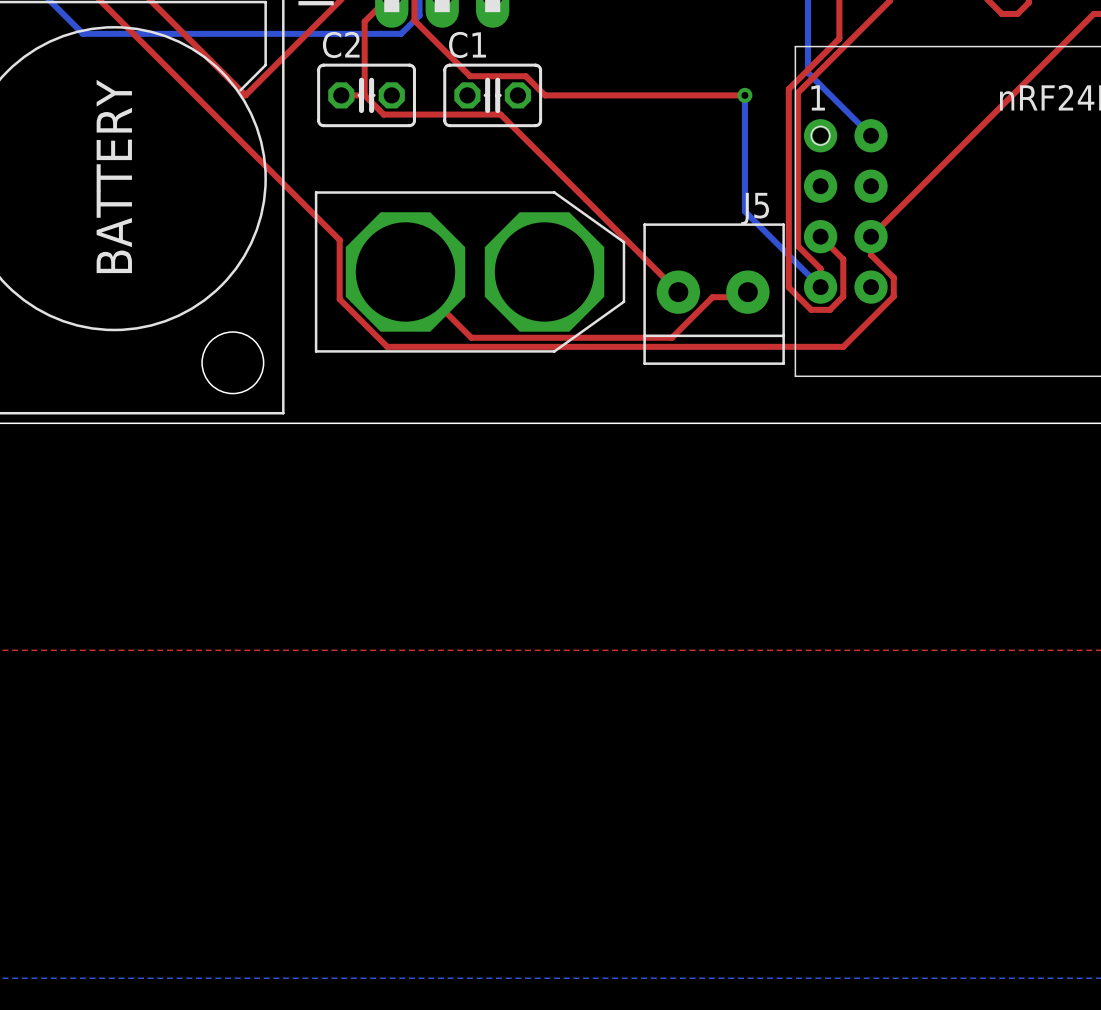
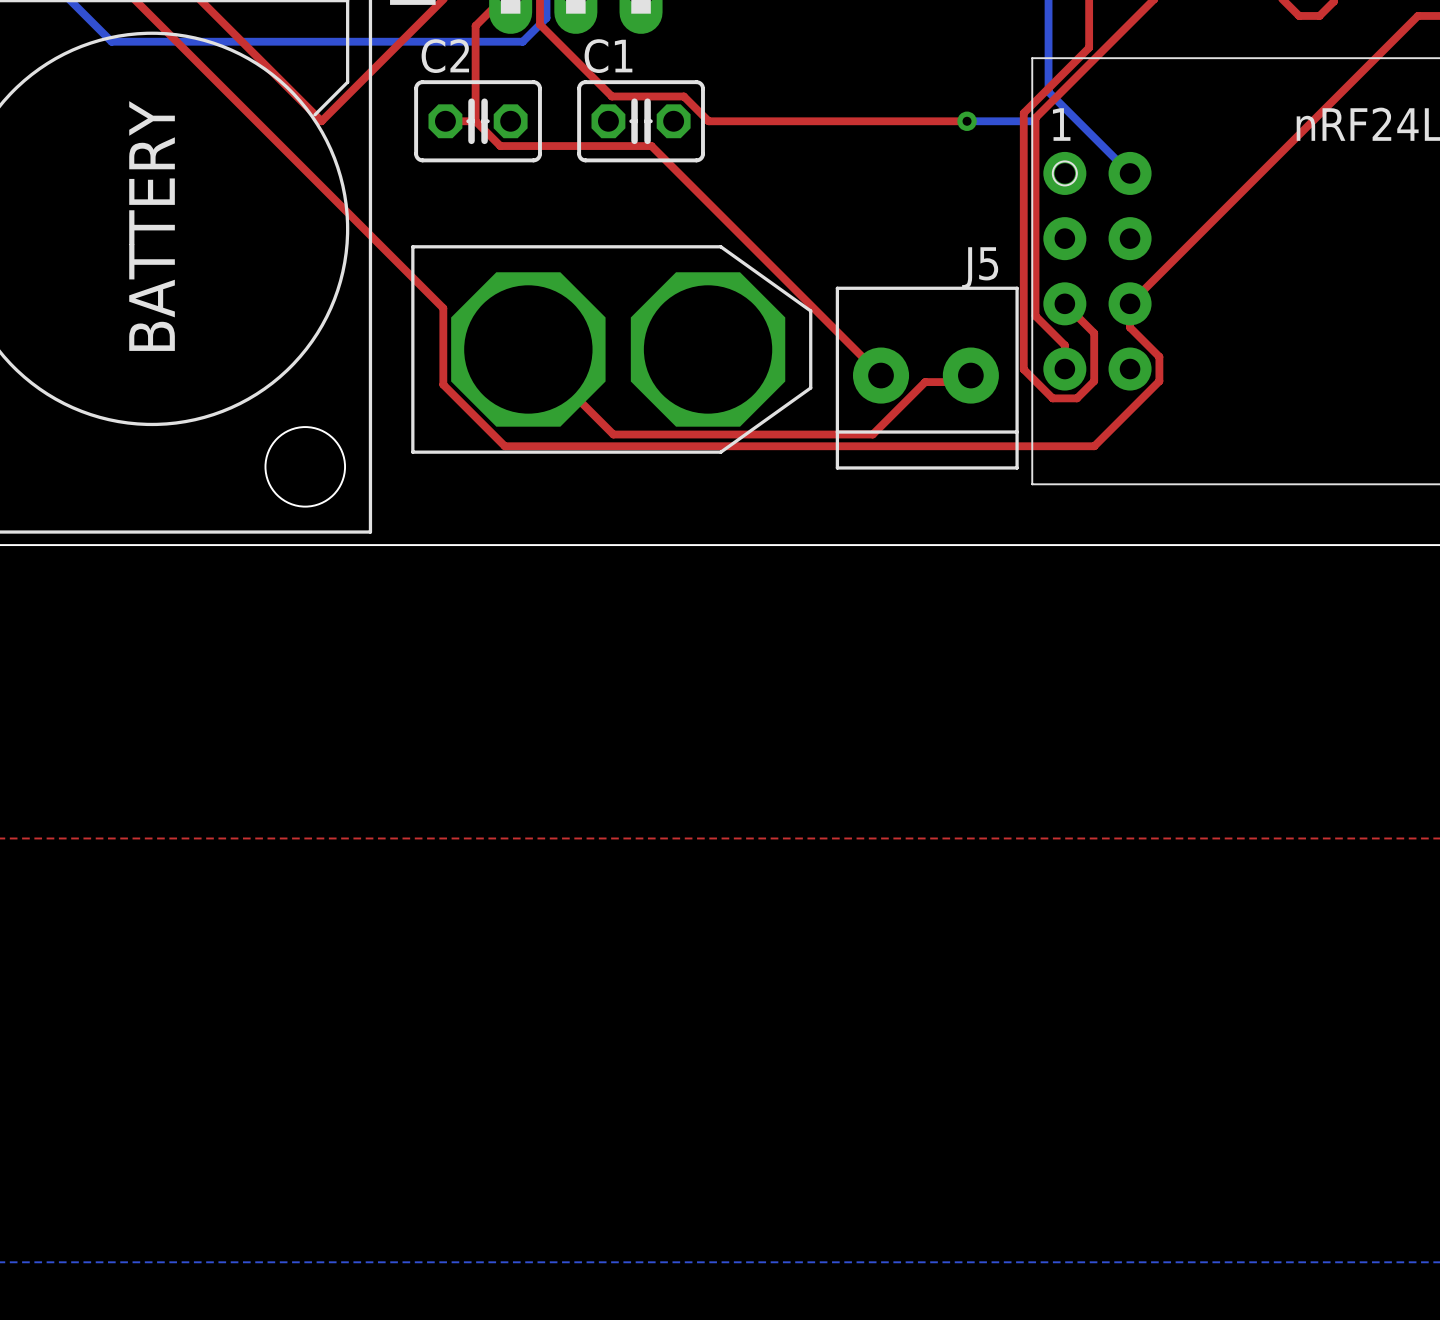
bottom track: (744, 95) (744, 211) (820, 287) -> (967, 121) (1032, 121)

